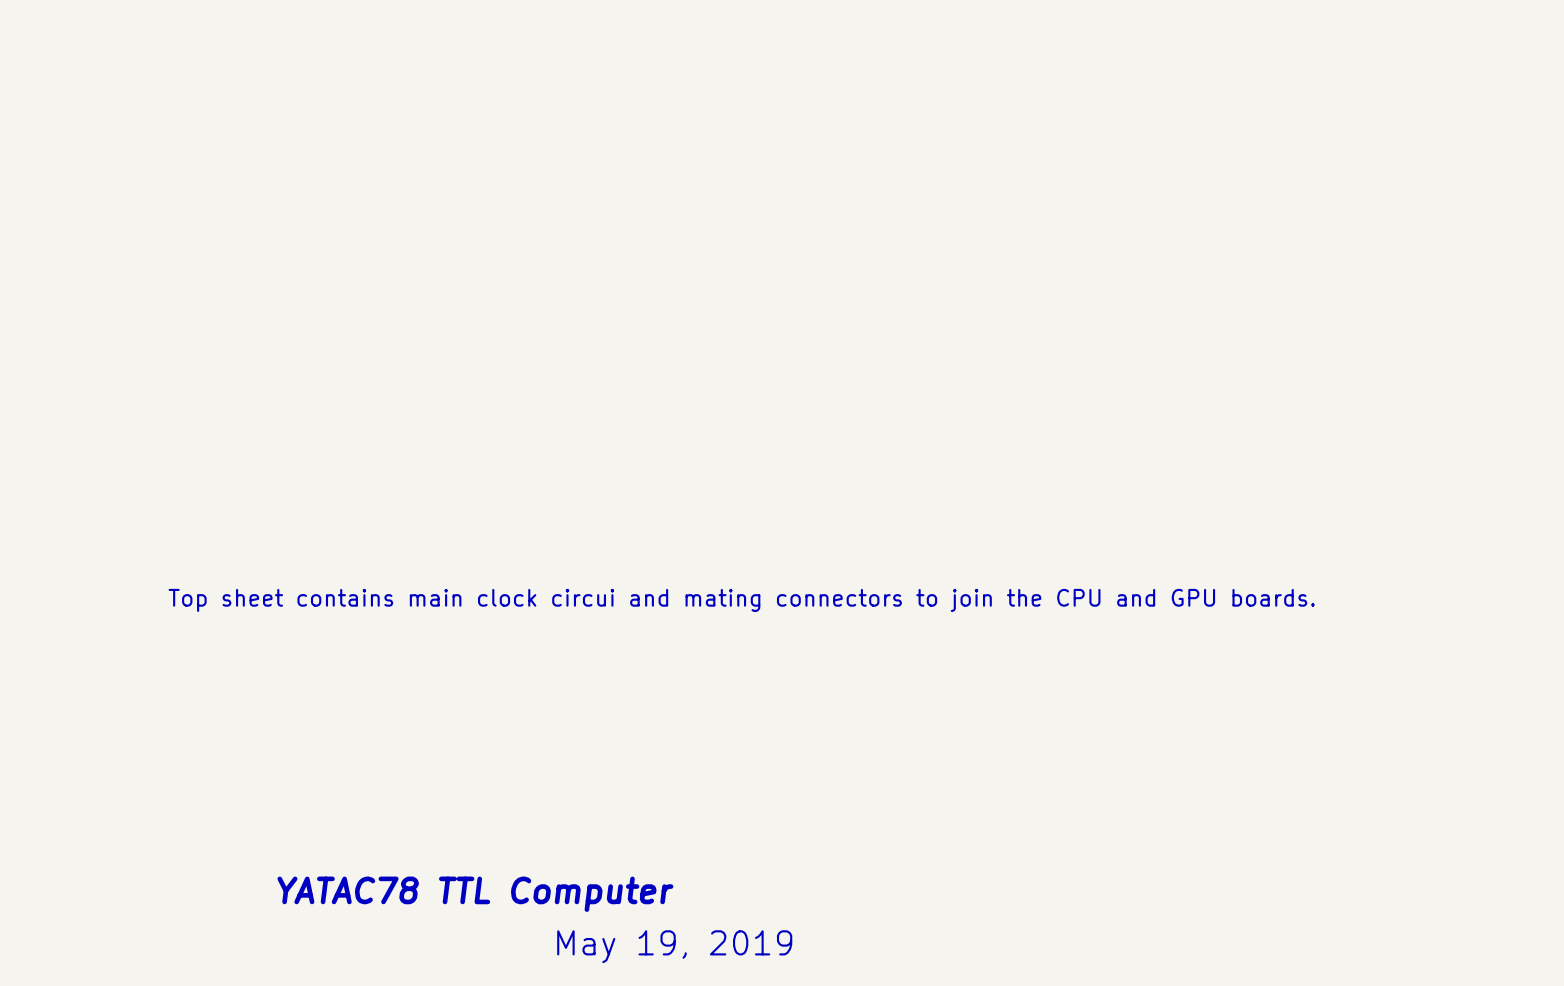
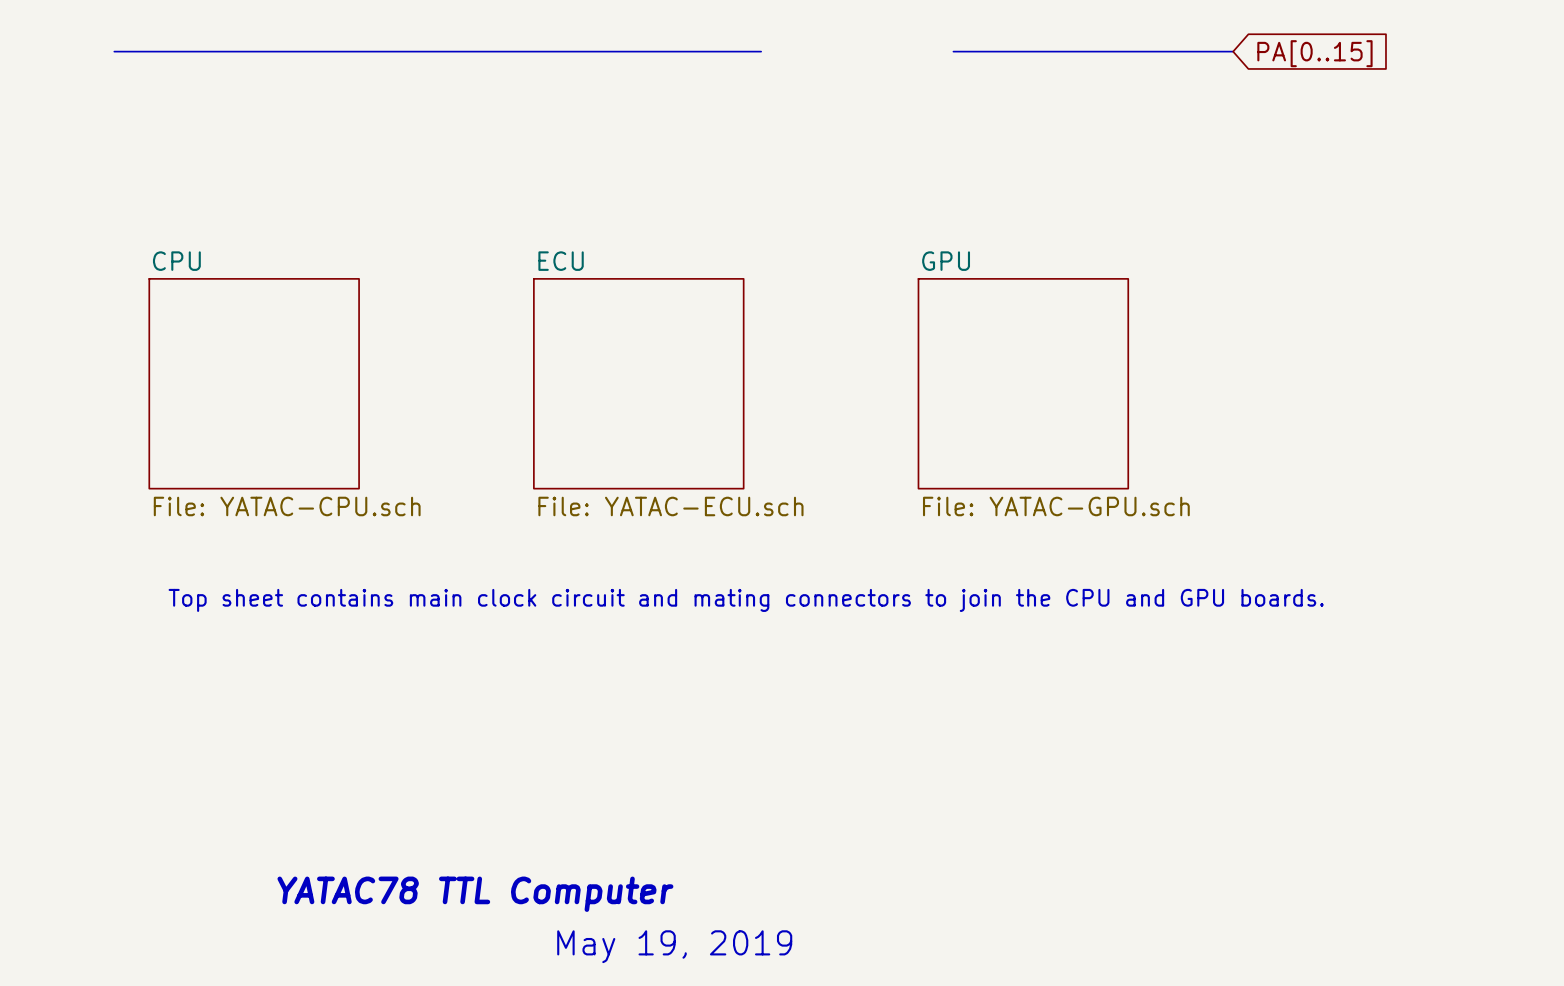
bus: none -> (114, 51) (761, 51)
bus: none -> (953, 51) (1233, 51)
global label: none -> PA[0..15] (1314, 53)
sheet CPU: none -> File: YATAC-CPU.sch (254, 383)
sheet ECU: none -> File: YATAC-ECU.sch (638, 383)
sheet GPU: none -> File: YATAC-GPU.sch (1023, 383)
text: Top sheet contains main clock circui and mating connectors to join the CPU and GPU boards. (741, 600) -> Top sheet contains main clock circuit and mating connectors to join the CPU and GPU boards. (746, 600)

